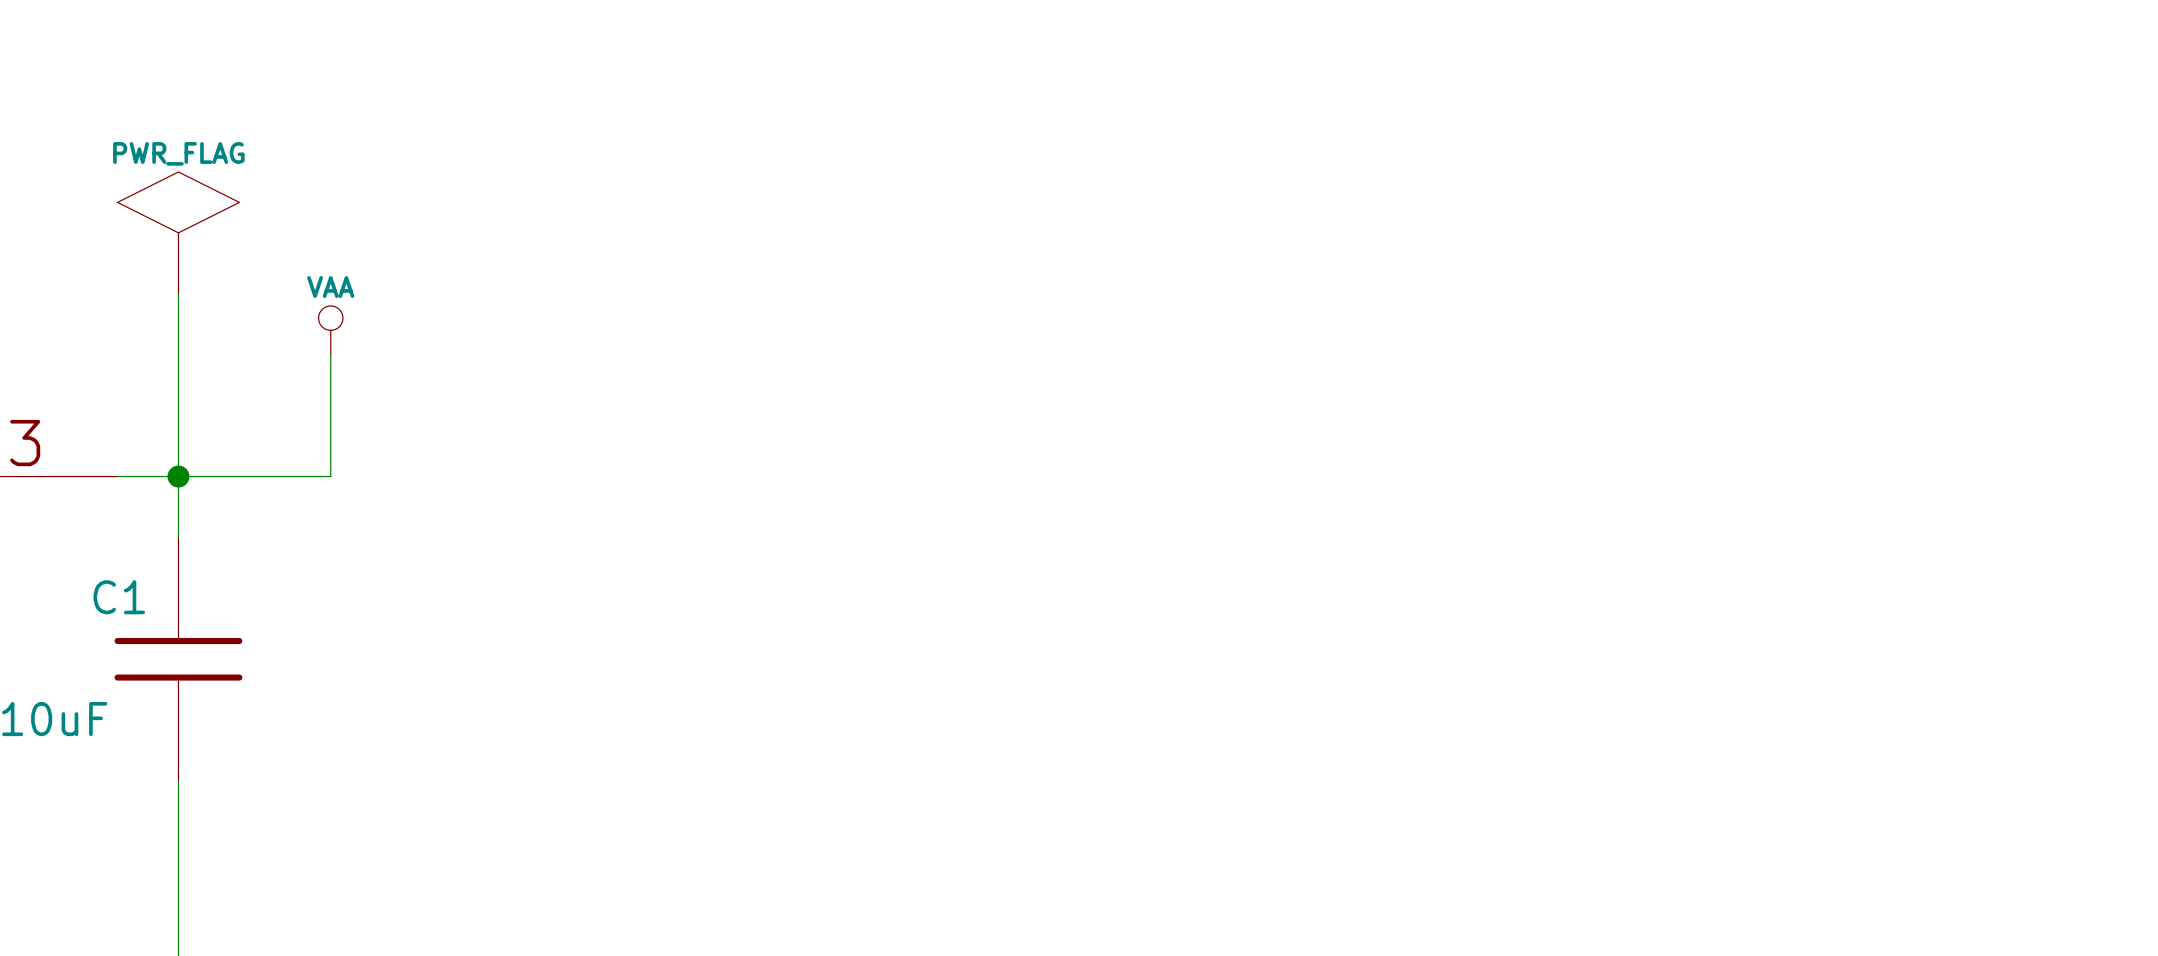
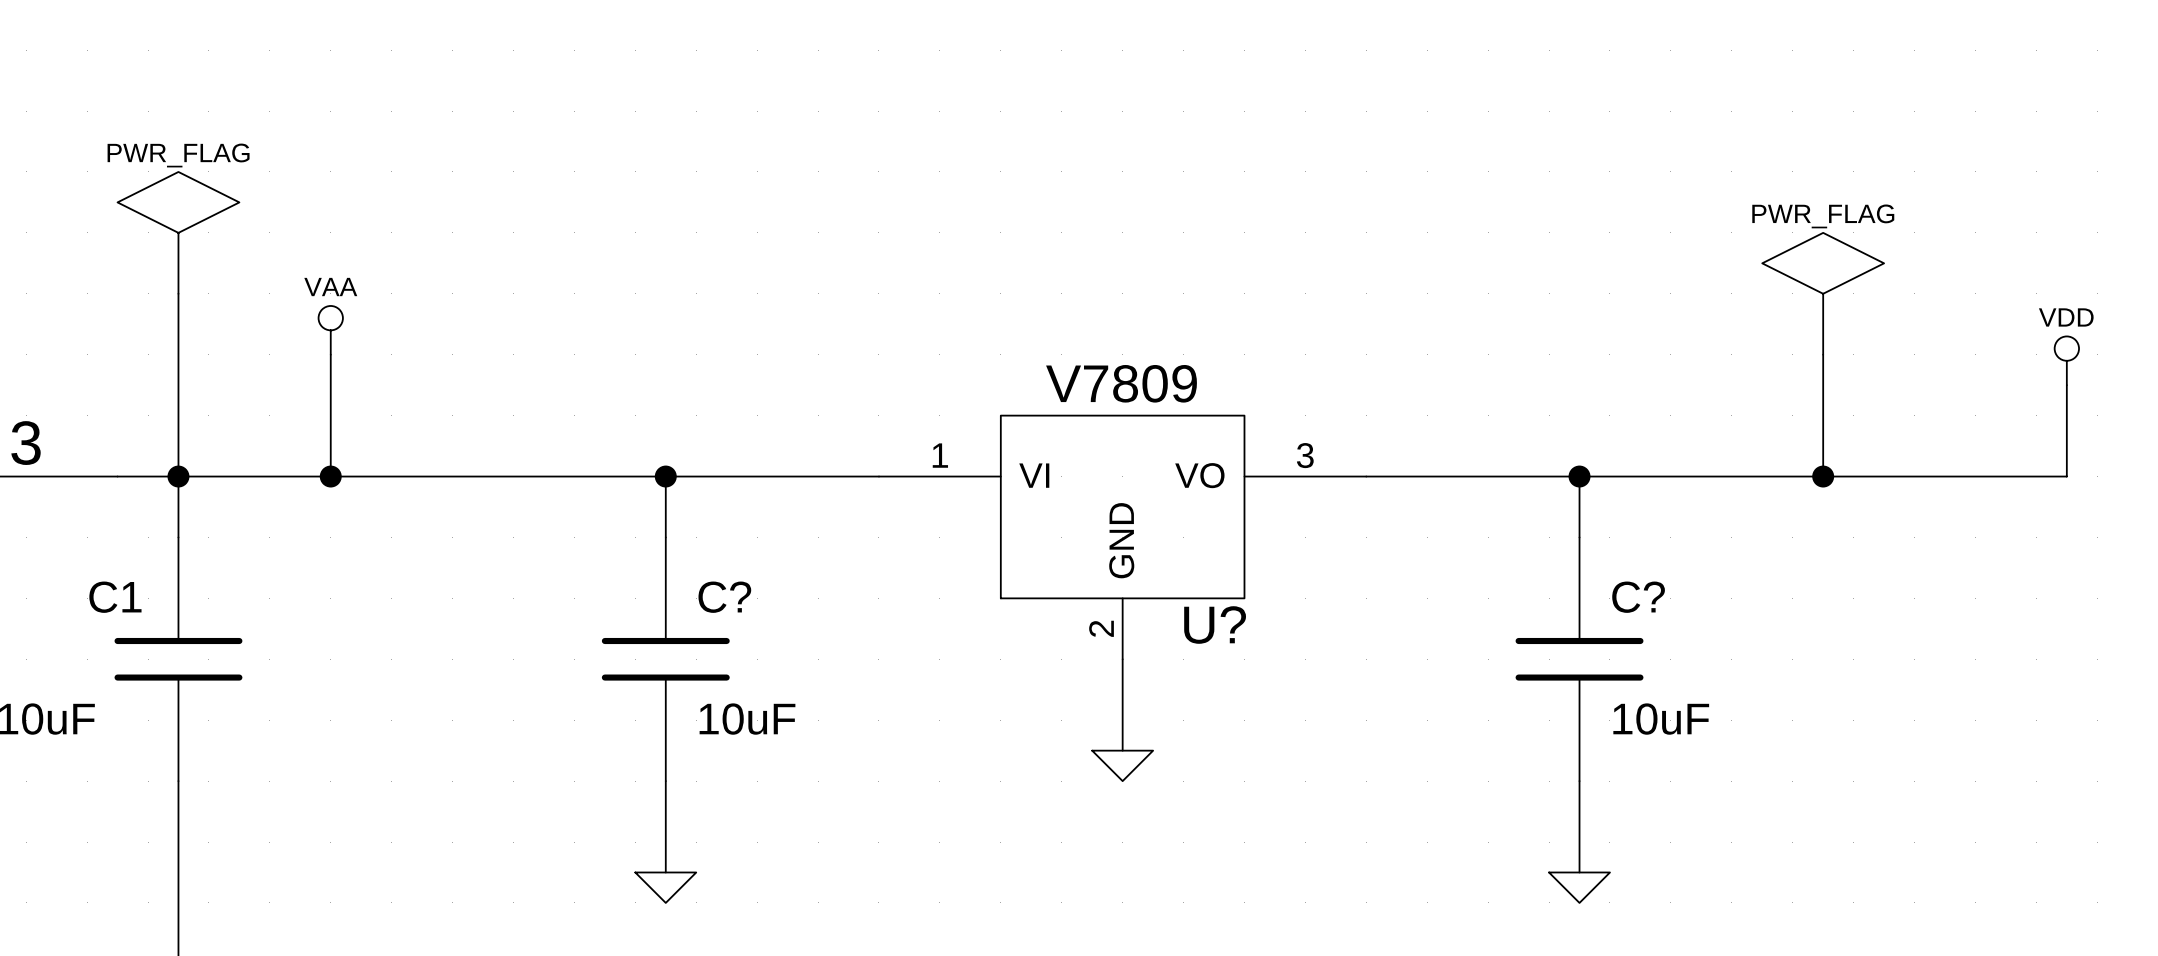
power symbol: none -> PWR_FLAG (1823, 293)
wire: none -> (1823, 354) (1823, 476)
power symbol: none -> VDD (2066, 360)
wire: none -> (2066, 385) (2066, 476) (1366, 476)
wire: none -> (330, 476) (878, 476)
junction: none -> (330, 476)
wire: none -> (665, 476) (665, 537)
junction: none -> (665, 476)
wire: none -> (1579, 476) (1579, 537)
junction: none -> (1579, 476)
junction: none -> (1823, 476)
U?: none -> V7809 (1122, 537)
C?: none -> 10uF (665, 659)
wire: none -> (1122, 659) (1122, 750)
C?: none -> 10uF (1579, 659)
power symbol: none -> (1122, 765)
wire: none -> (665, 781) (665, 872)
wire: none -> (1579, 781) (1579, 872)
power symbol: none -> (665, 887)
power symbol: none -> (1579, 887)

